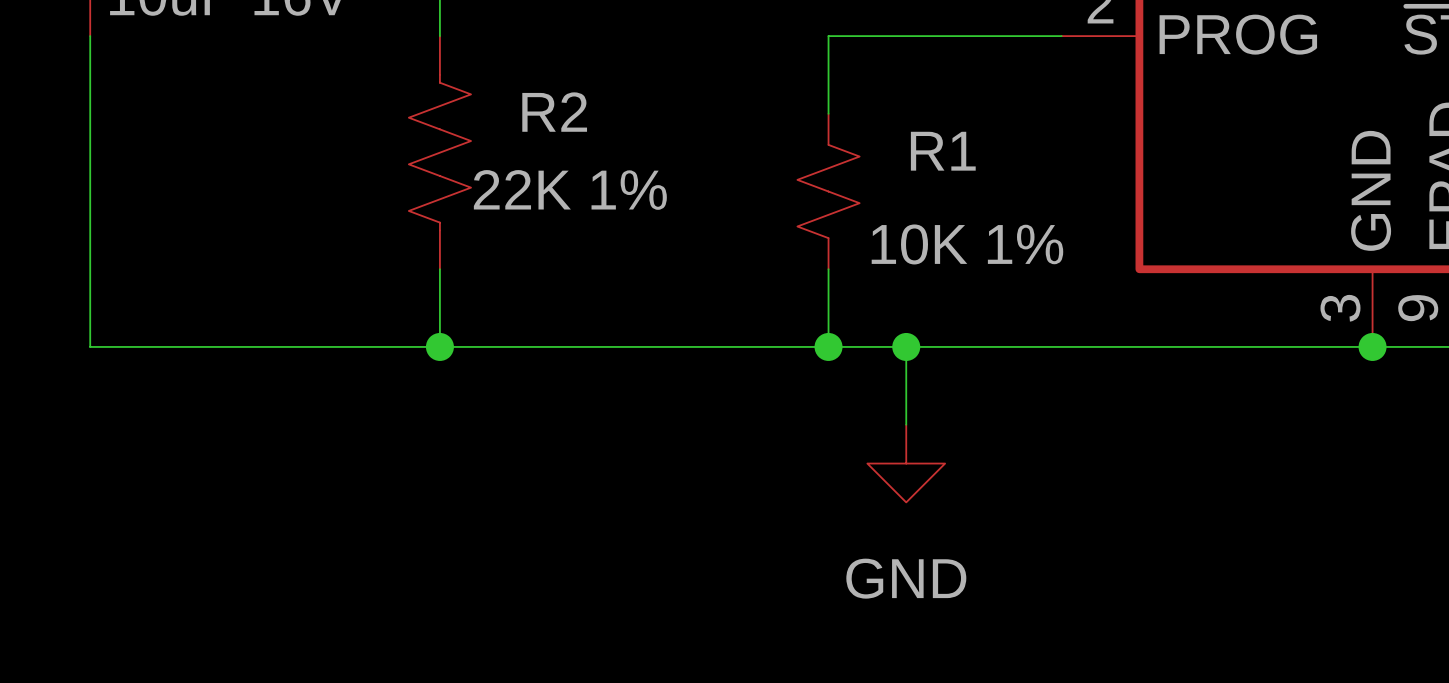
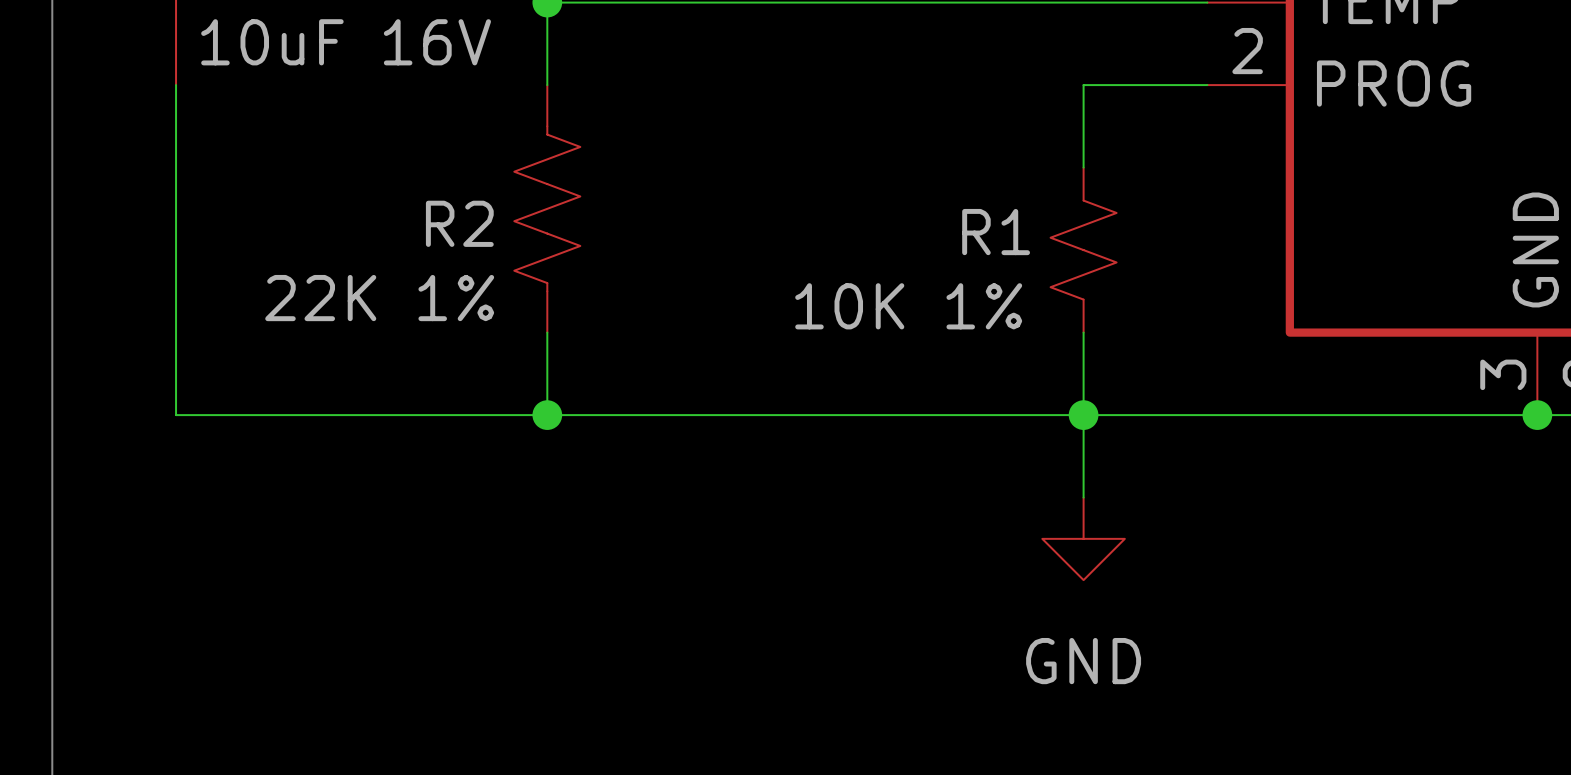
wire: (945, 36) (828, 36) (828, 113) -> (1083, 85) (1083, 167)
R2 name position: R2 (554, 112) -> R2 (459, 223)
R1 name position: R1 (943, 151) -> R1 (996, 232)
R2 value position: 22K 1% (570, 189) -> 22K 1% (379, 298)
R1 position: (828, 191) -> (1083, 250)
R1 value position: 10K 1% (967, 244) -> 10K 1% (908, 306)
wire: (828, 269) (828, 346) -> none
wire: none -> (1083, 332) (1083, 497)
junction: (828, 346) -> none
wire: (906, 346) (906, 424) -> none
junction position: (906, 346) -> (1083, 415)
power symbol position: GND (906, 463) -> GND (1083, 538)

